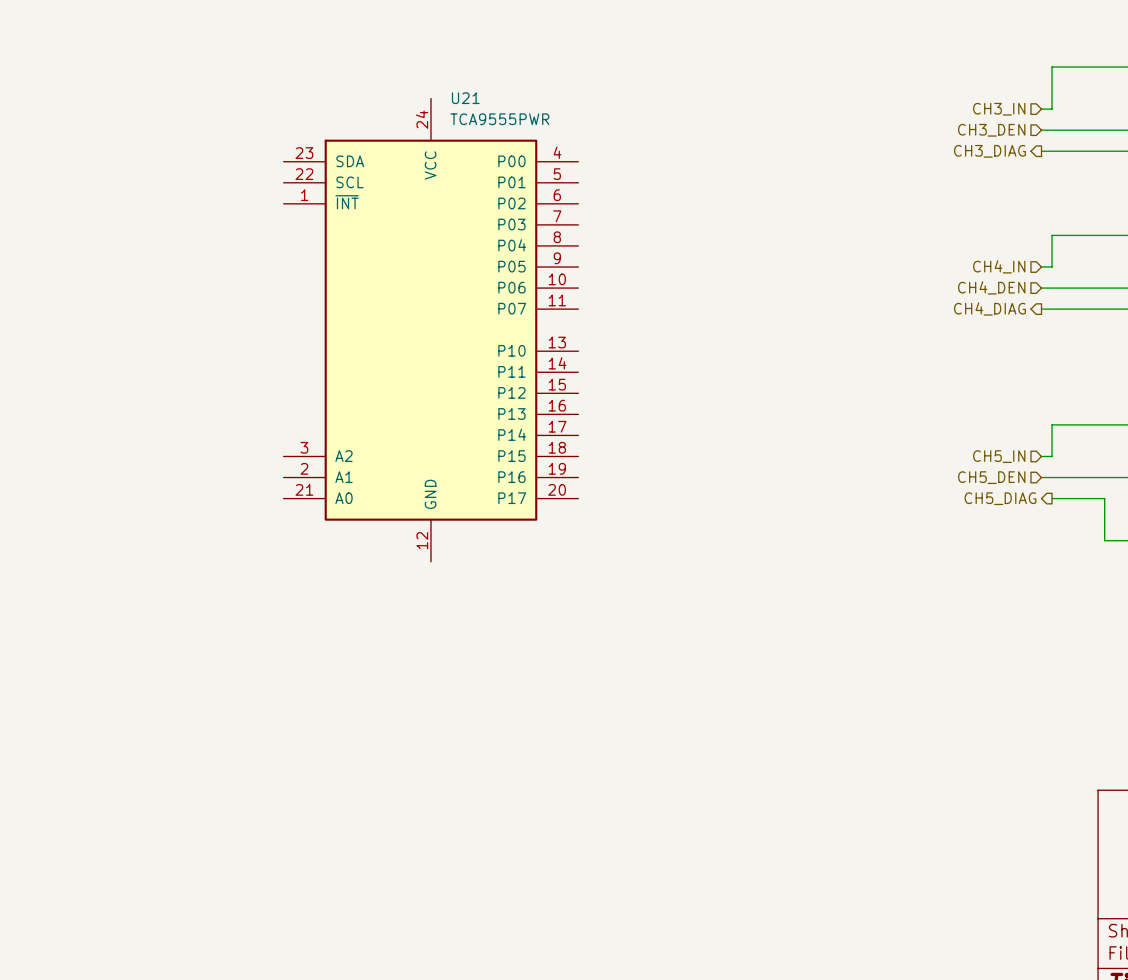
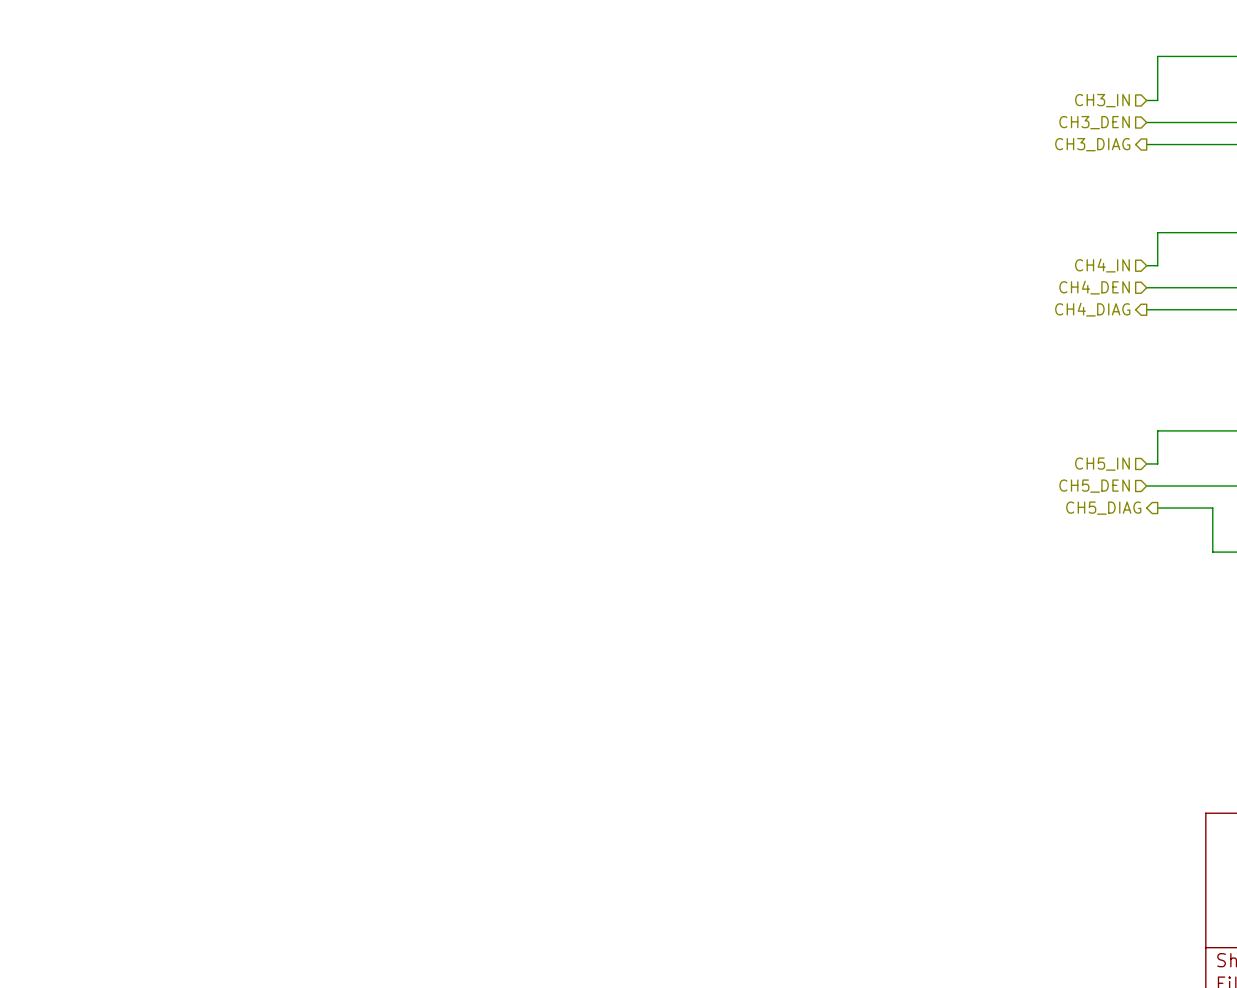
U21: TCA9555PWR (430, 330) -> none

